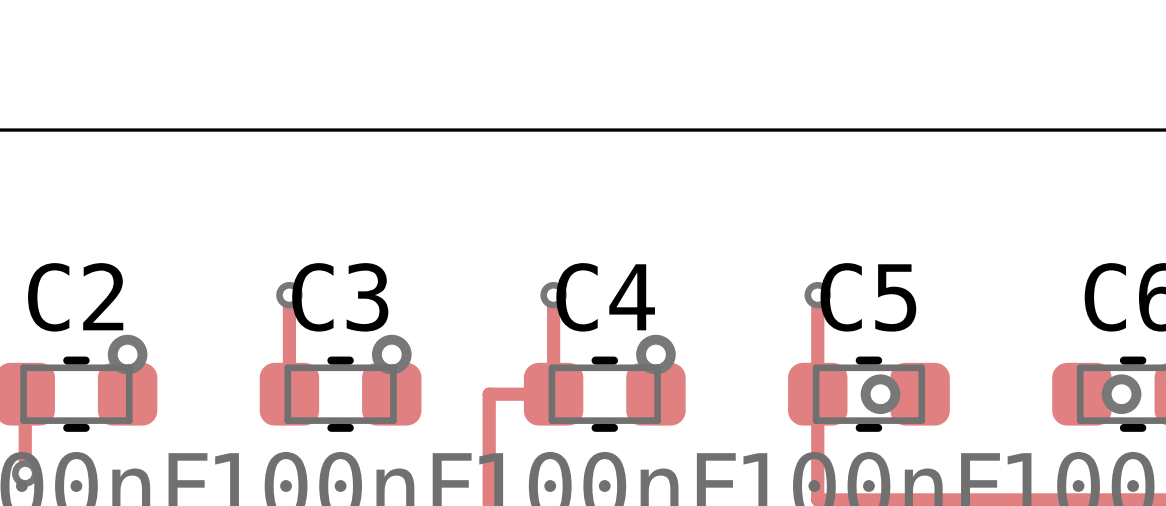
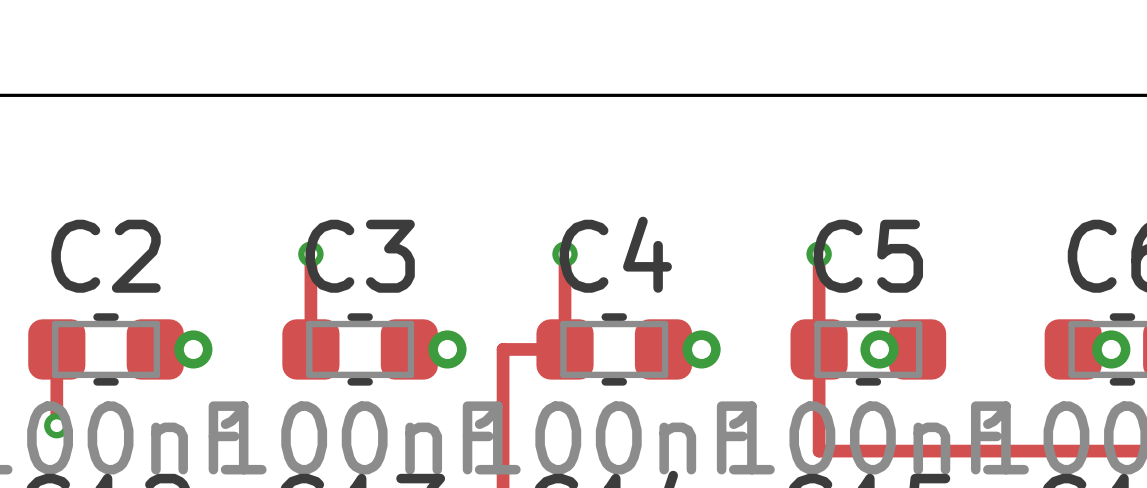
via position: (127, 354) -> (193, 349)
via position: (391, 354) -> (447, 349)
via position: (655, 354) -> (701, 349)

